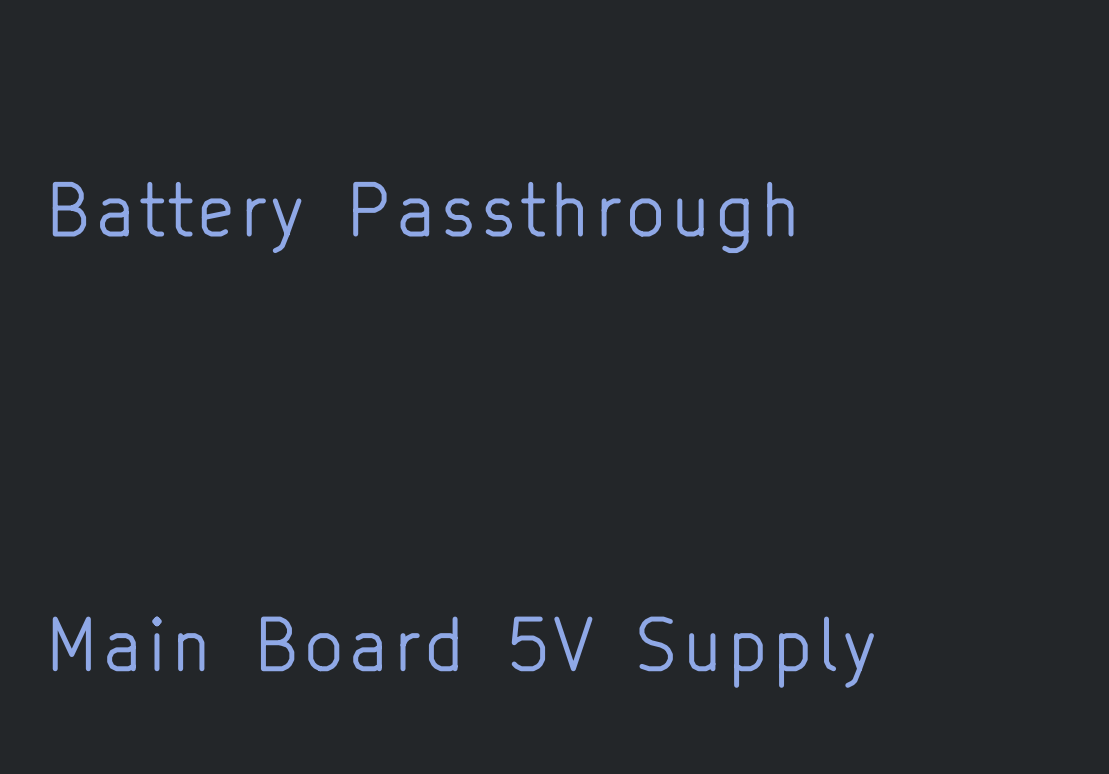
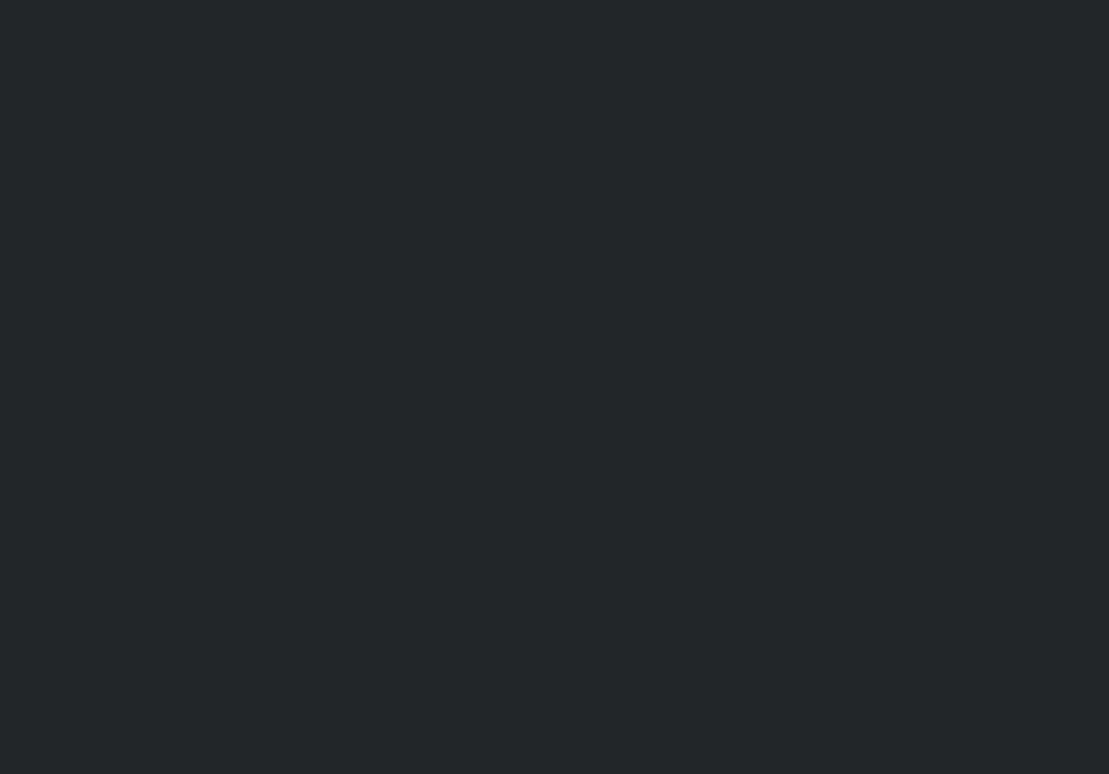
text: Battery Passthrough (423, 217) -> none
text: Main Board 5V Supply (463, 652) -> none

